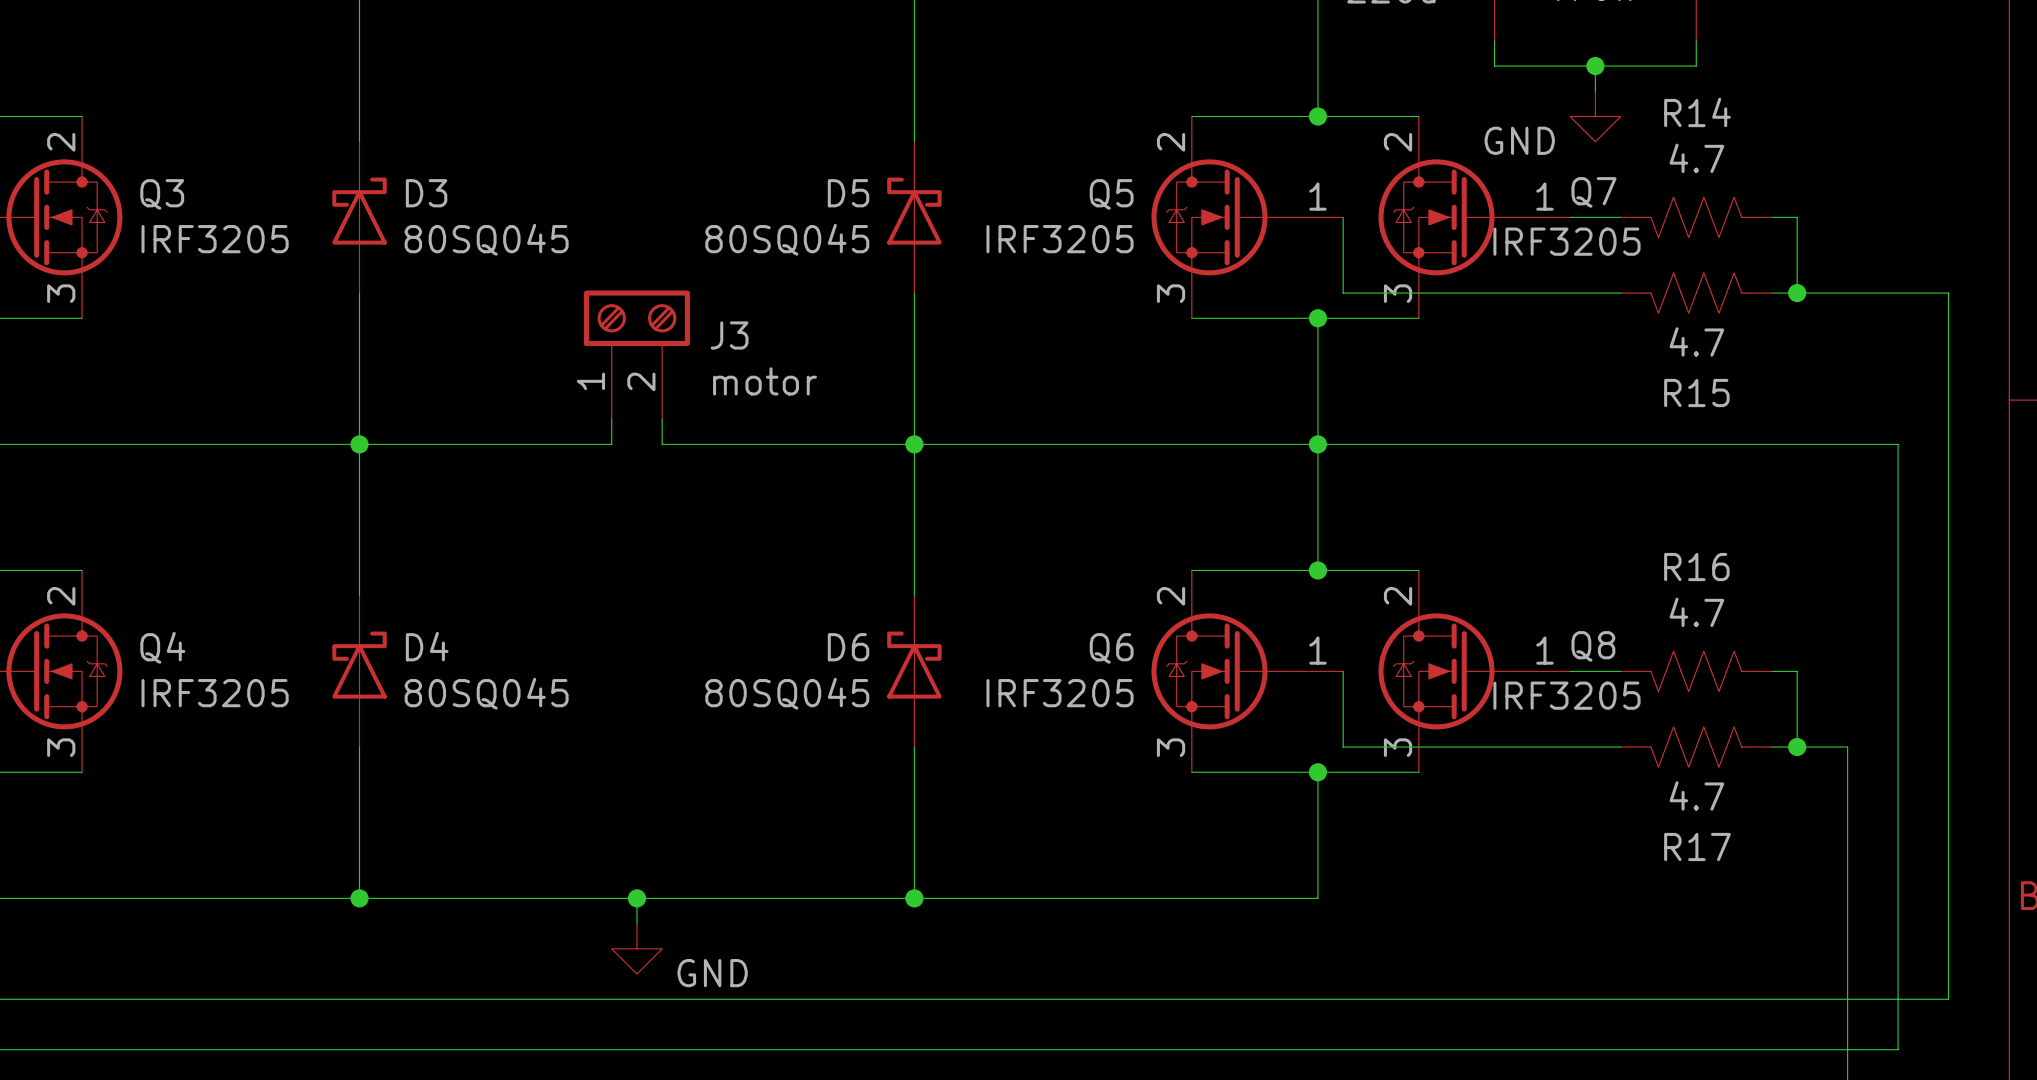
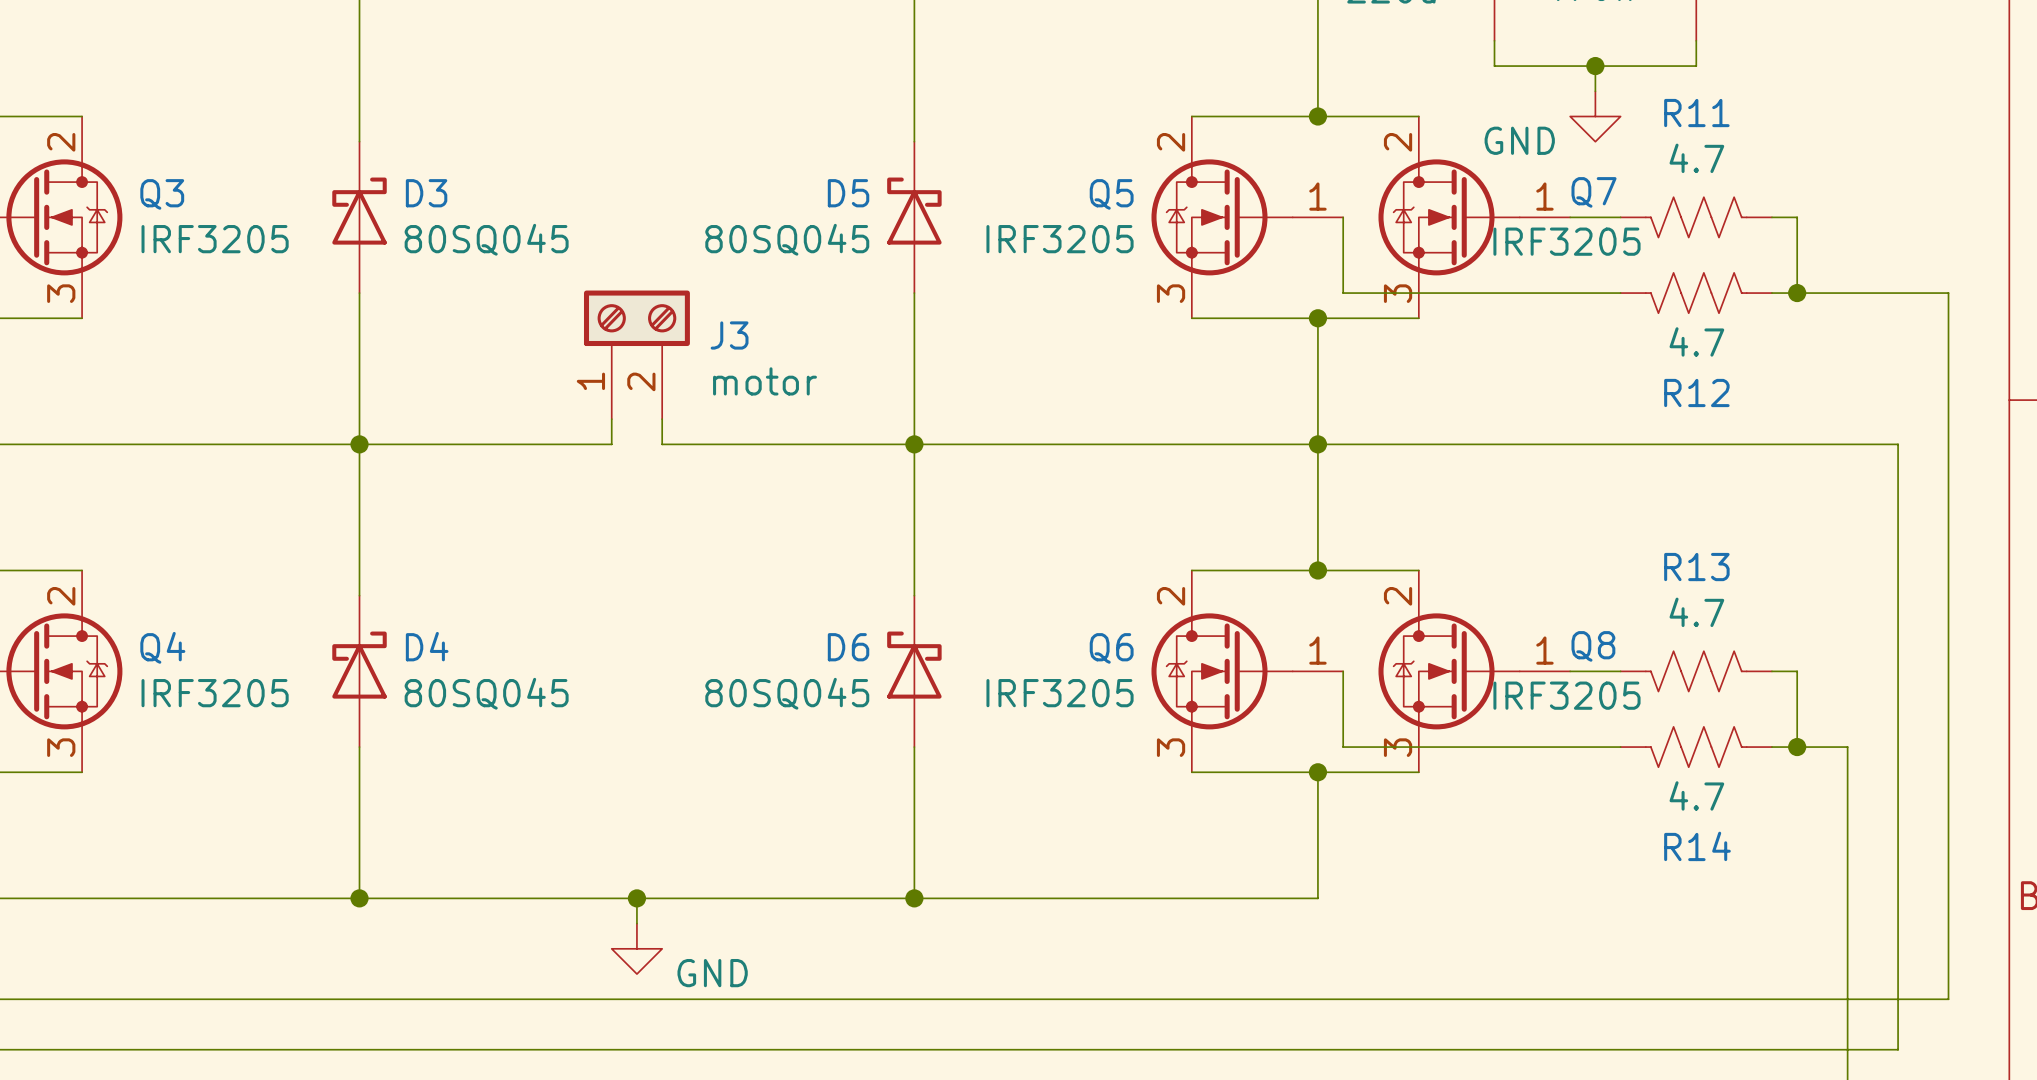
R14 name: R14 (1697, 112) -> R11 (1696, 113)
R15 name: R15 (1696, 392) -> R12 (1696, 392)
R16 name: R16 (1696, 567) -> R13 (1696, 567)
R17 name: R17 (1697, 846) -> R14 (1697, 846)

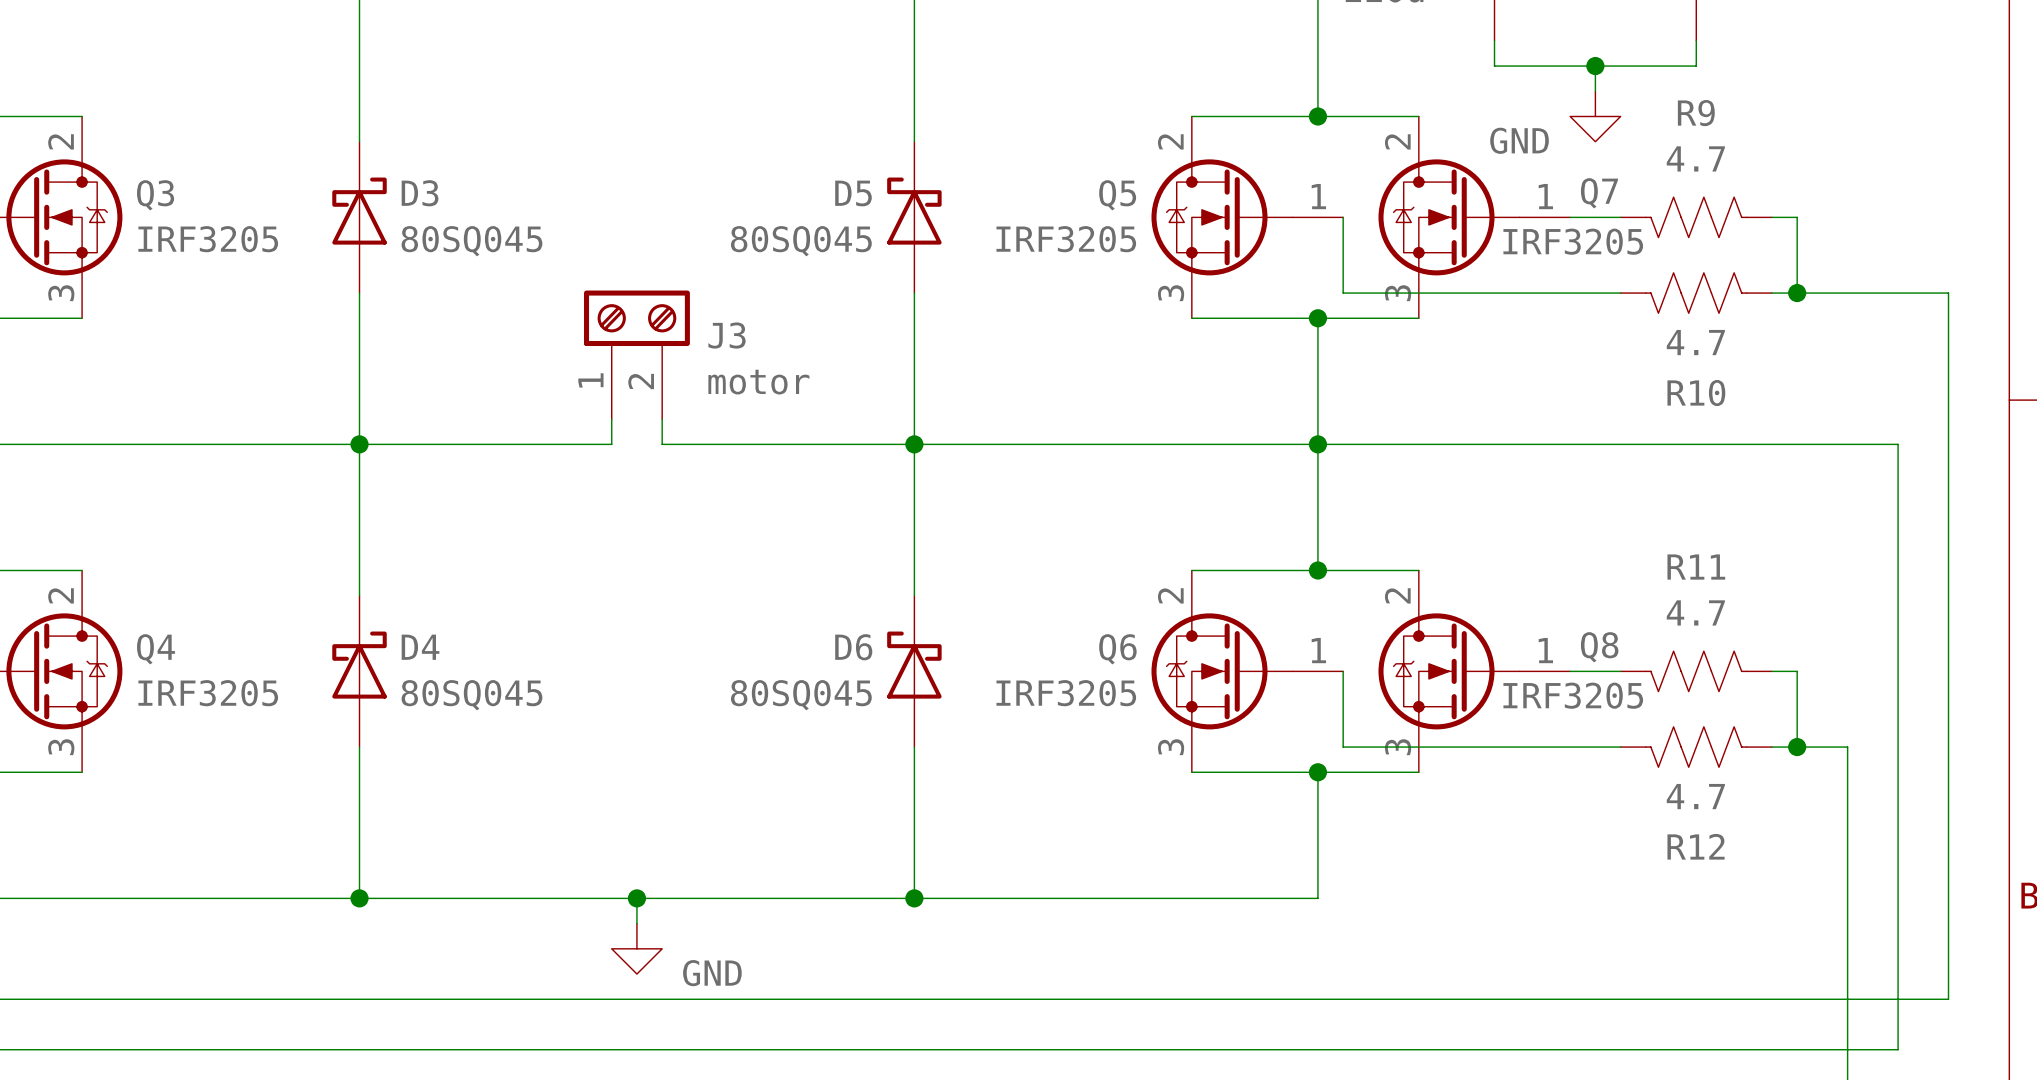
R11 name: R11 (1696, 113) -> R9 (1696, 113)
R12 name: R12 (1696, 392) -> R10 (1696, 393)
R13 name: R13 (1696, 567) -> R11 (1696, 567)
R14 name: R14 (1697, 846) -> R12 (1696, 846)

